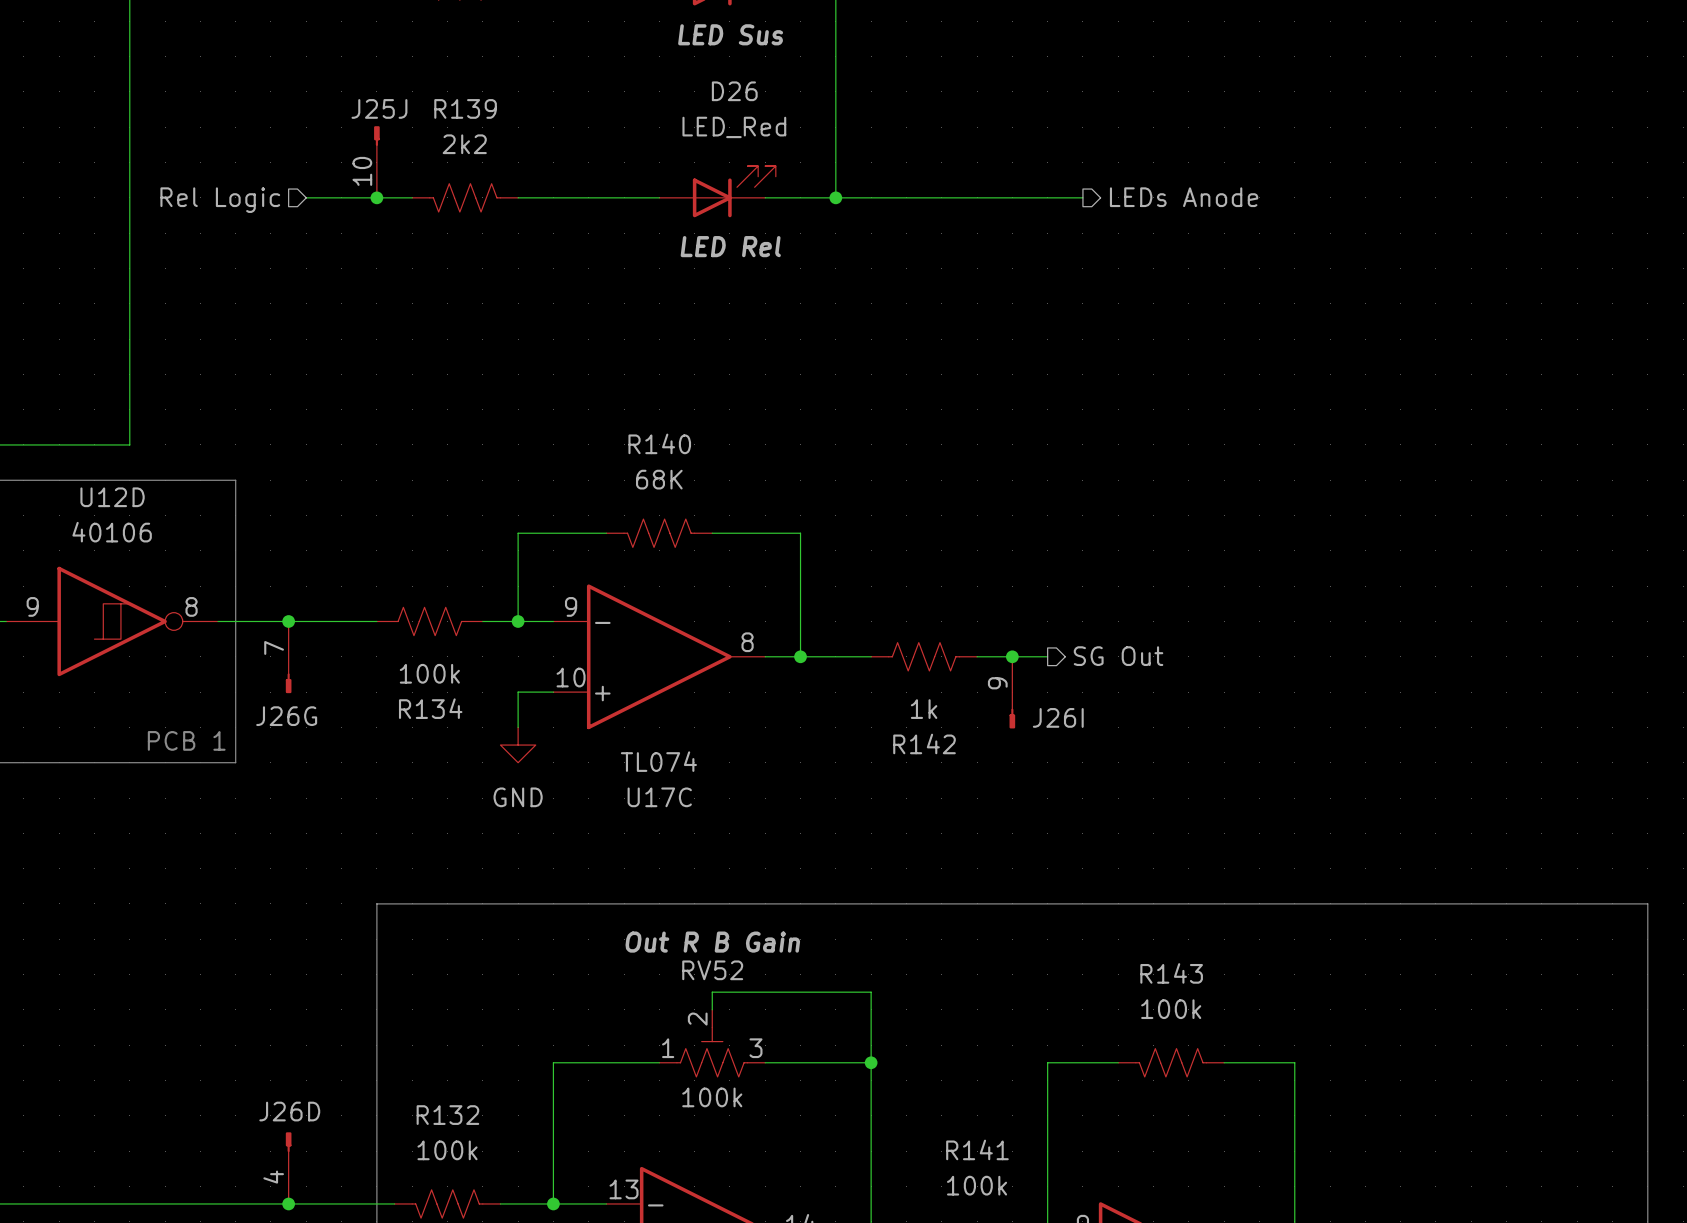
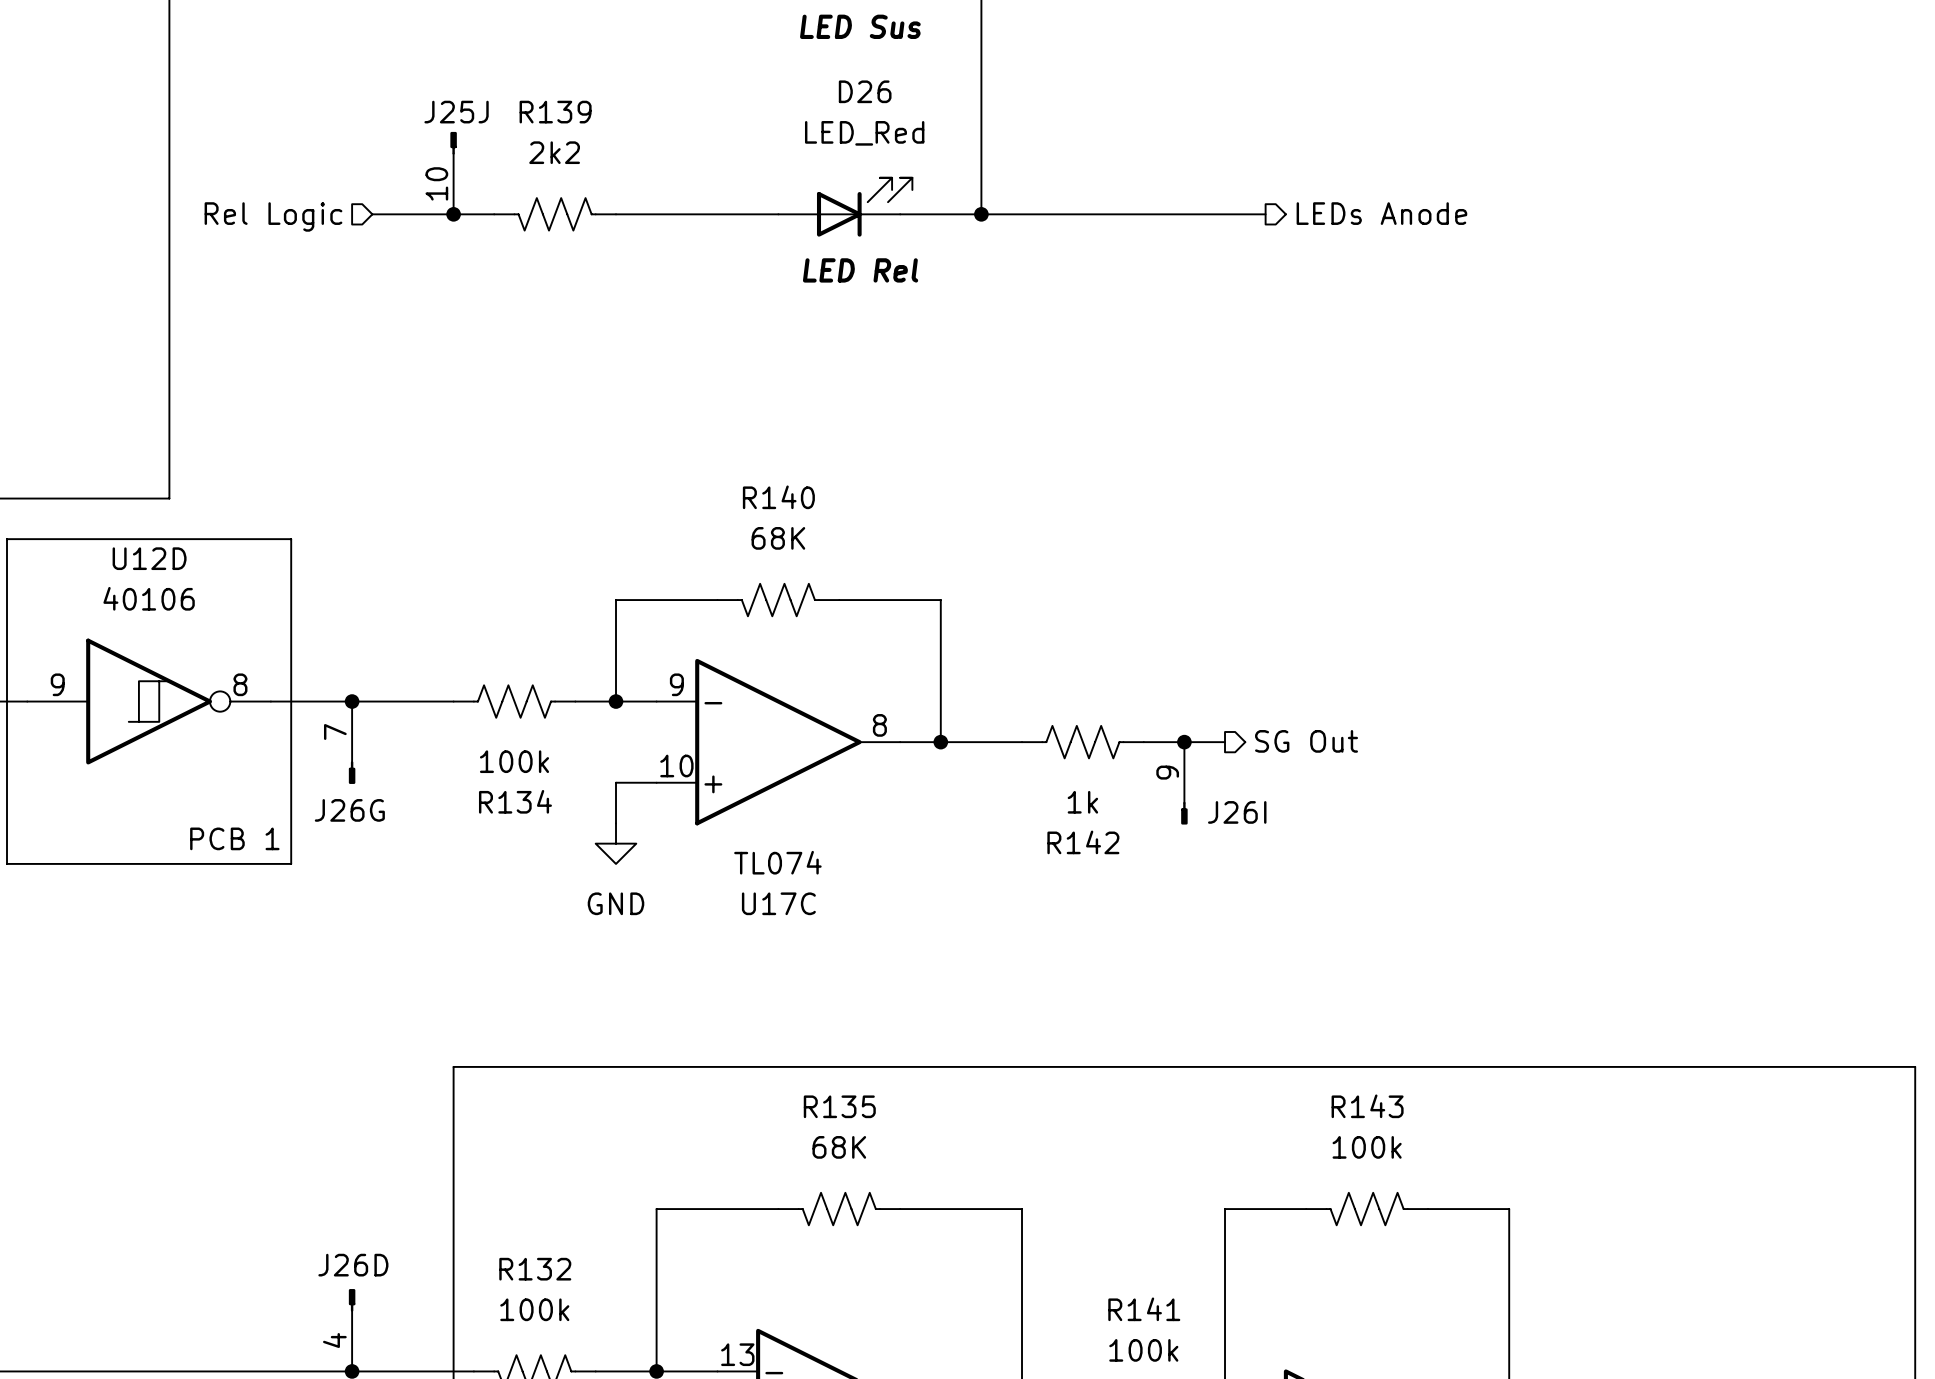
line: (376, 939) (376, 903) (1647, 903) (1647, 939) -> (453, 1066) (1915, 1066)
wire: (712, 1009) (712, 992) (871, 992) (871, 1062) -> none
RV52: 100k (712, 1043) -> none
R135: none -> 68K (839, 1209)
junction: (871, 1062) -> none

